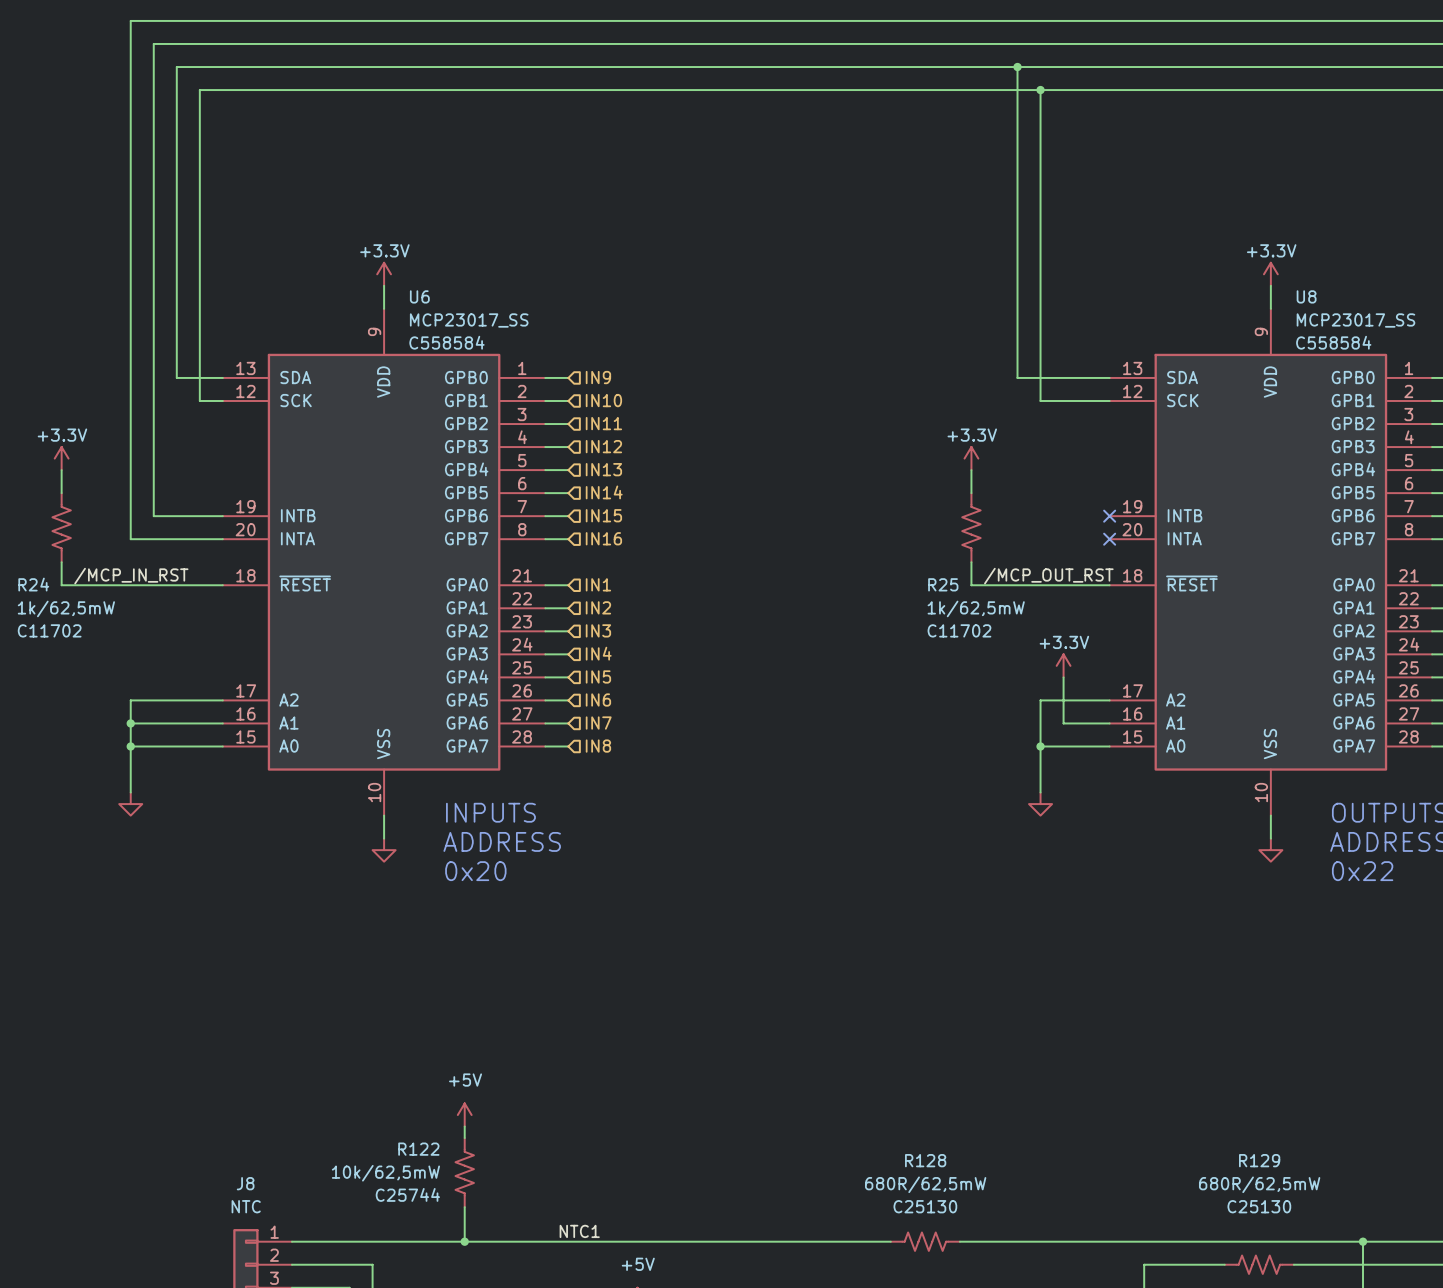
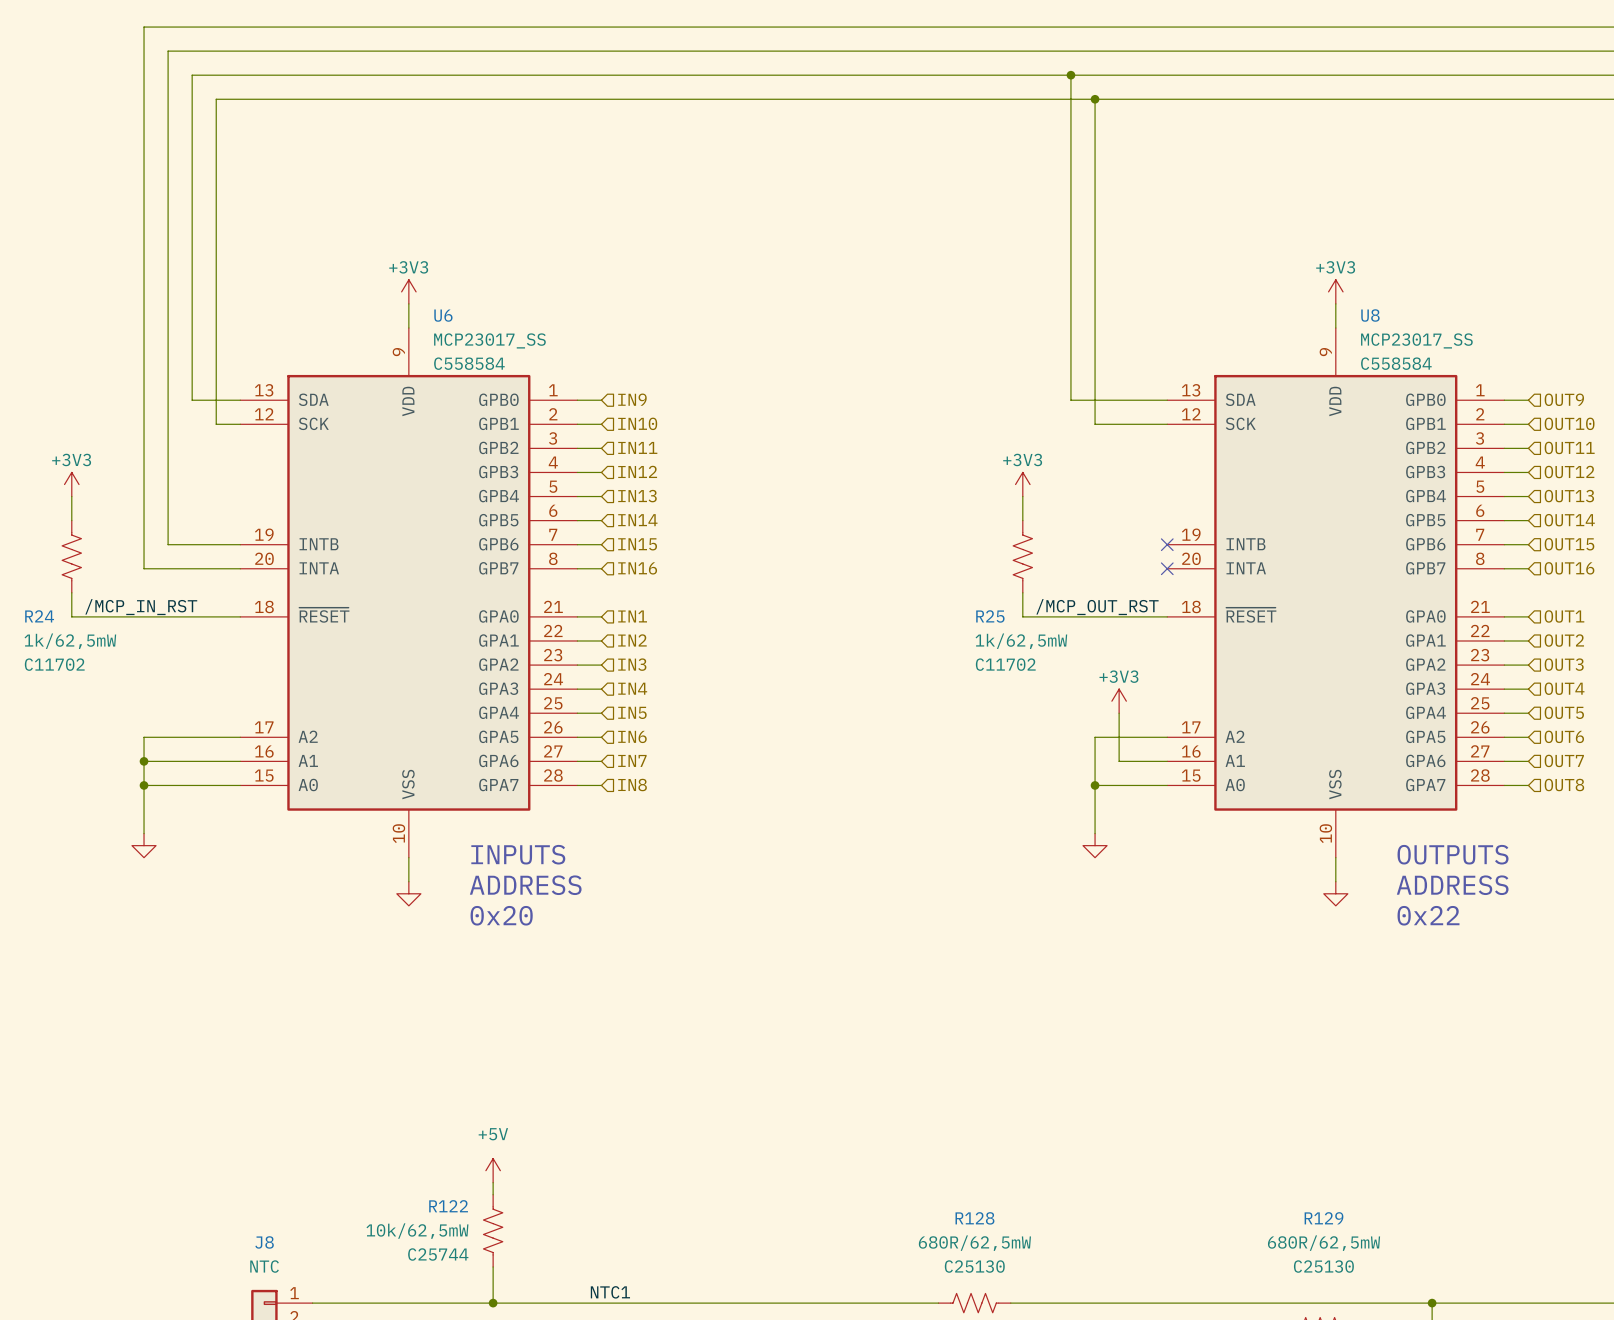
power symbol: +3.3V (384, 274) -> +3V3 (408, 291)
power symbol: +3.3V (1270, 274) -> +3V3 (1335, 291)
power symbol: +3.3V (61, 458) -> +3V3 (71, 484)
power symbol: +3.3V (971, 458) -> +3V3 (1022, 484)
power symbol: +3.3V (1063, 665) -> +3V3 (1119, 701)

